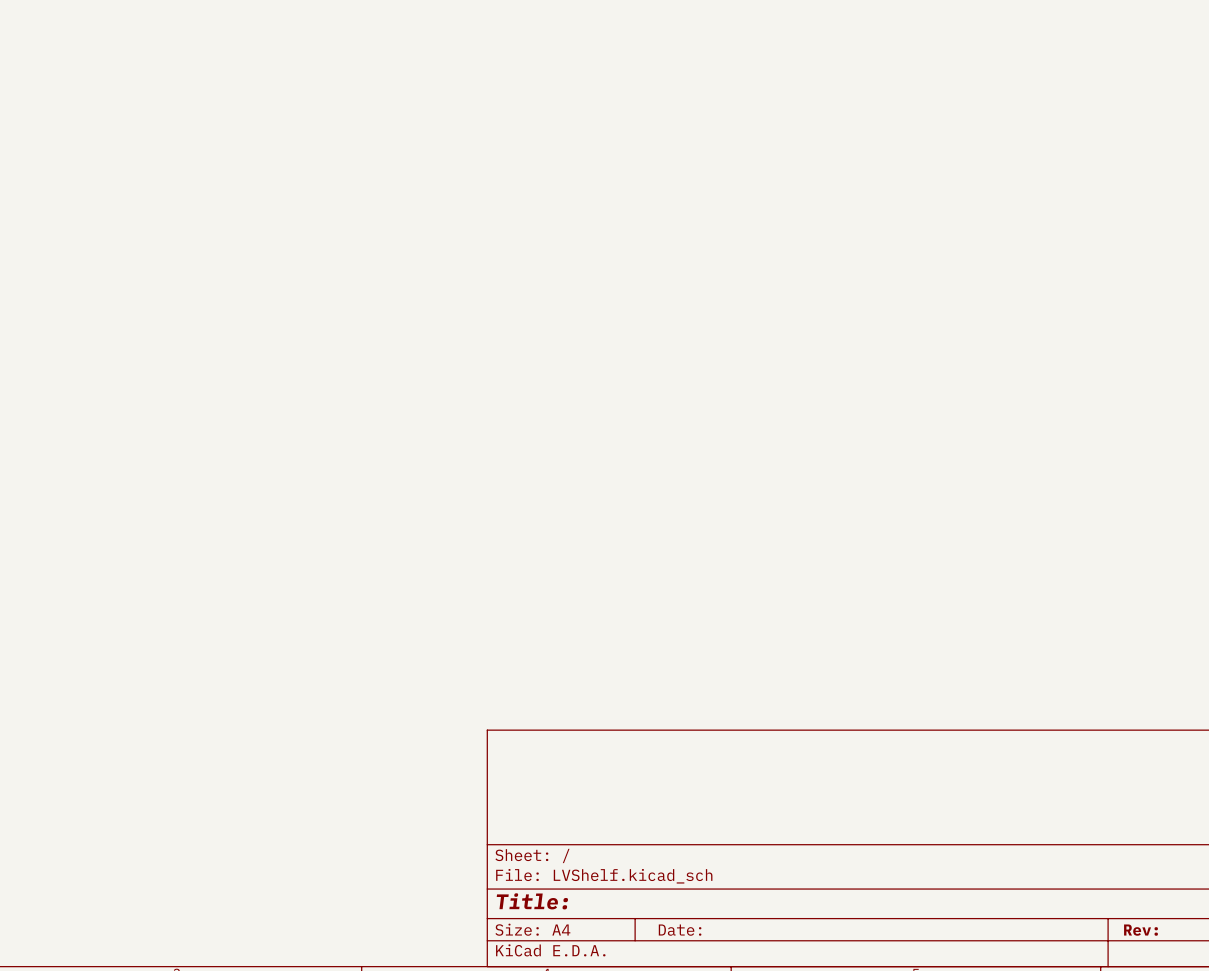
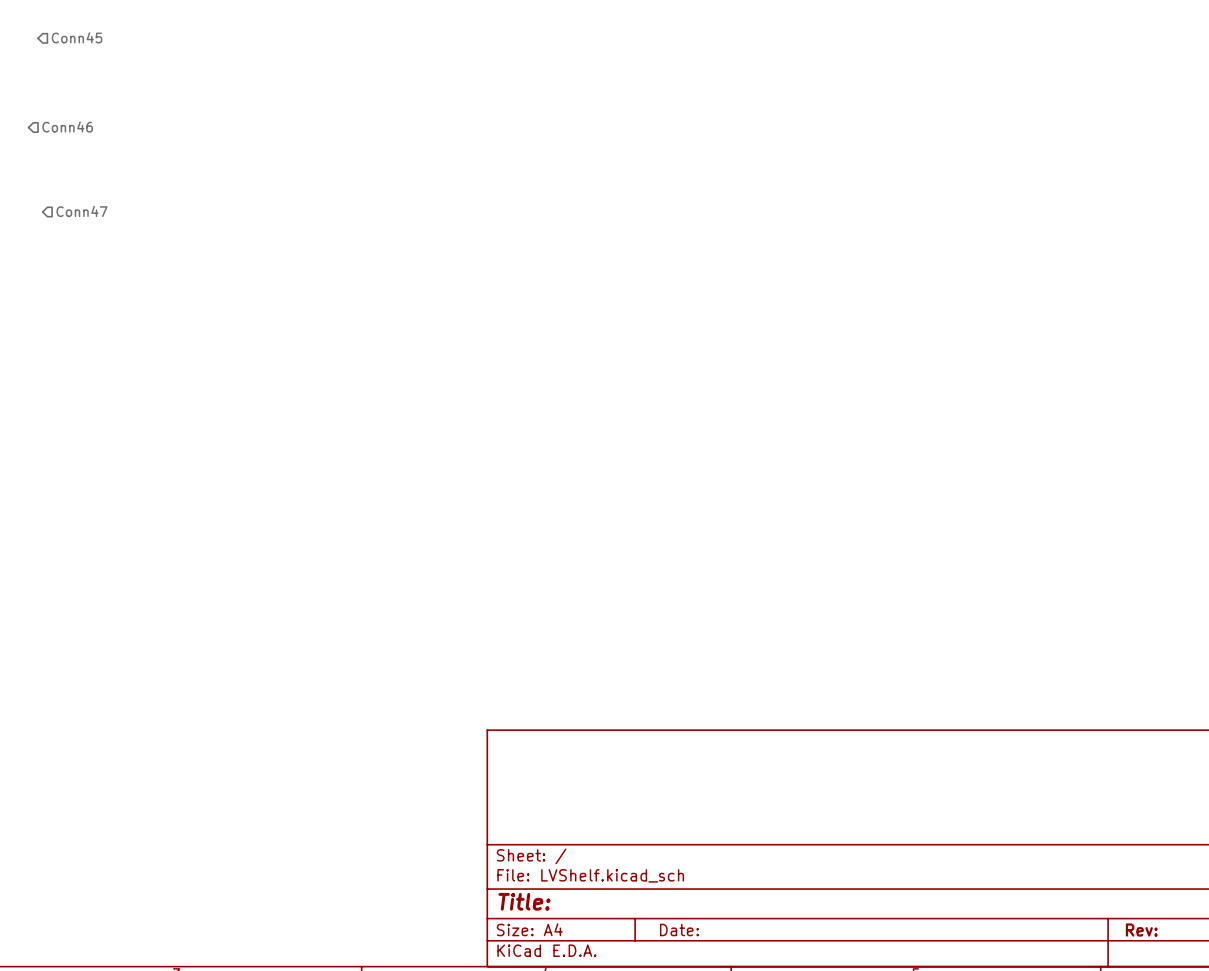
hierarchical label: none -> Conn45 (77, 37)
hierarchical label: none -> Conn46 (67, 126)
hierarchical label: none -> Conn47 (81, 211)

